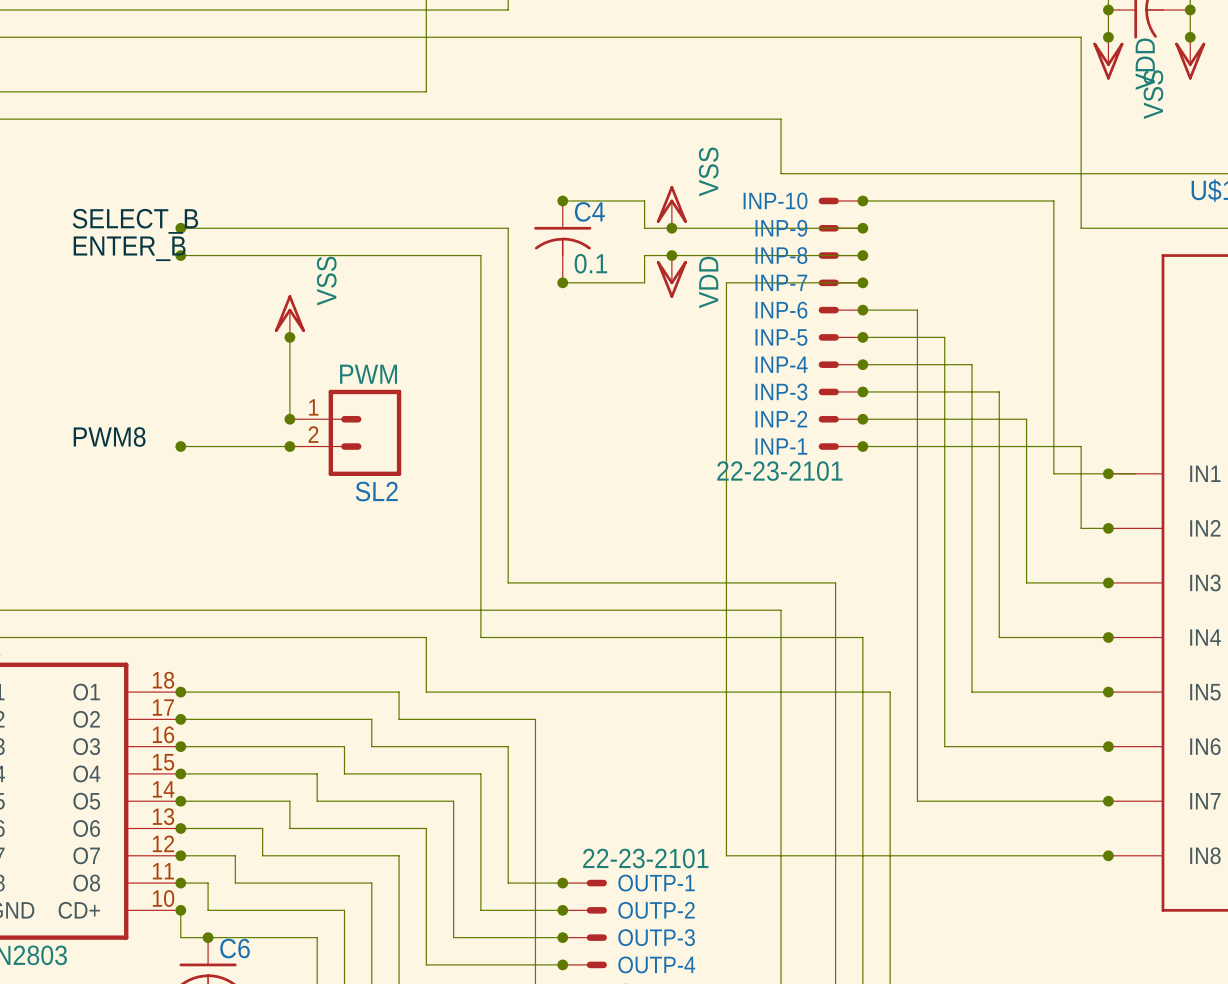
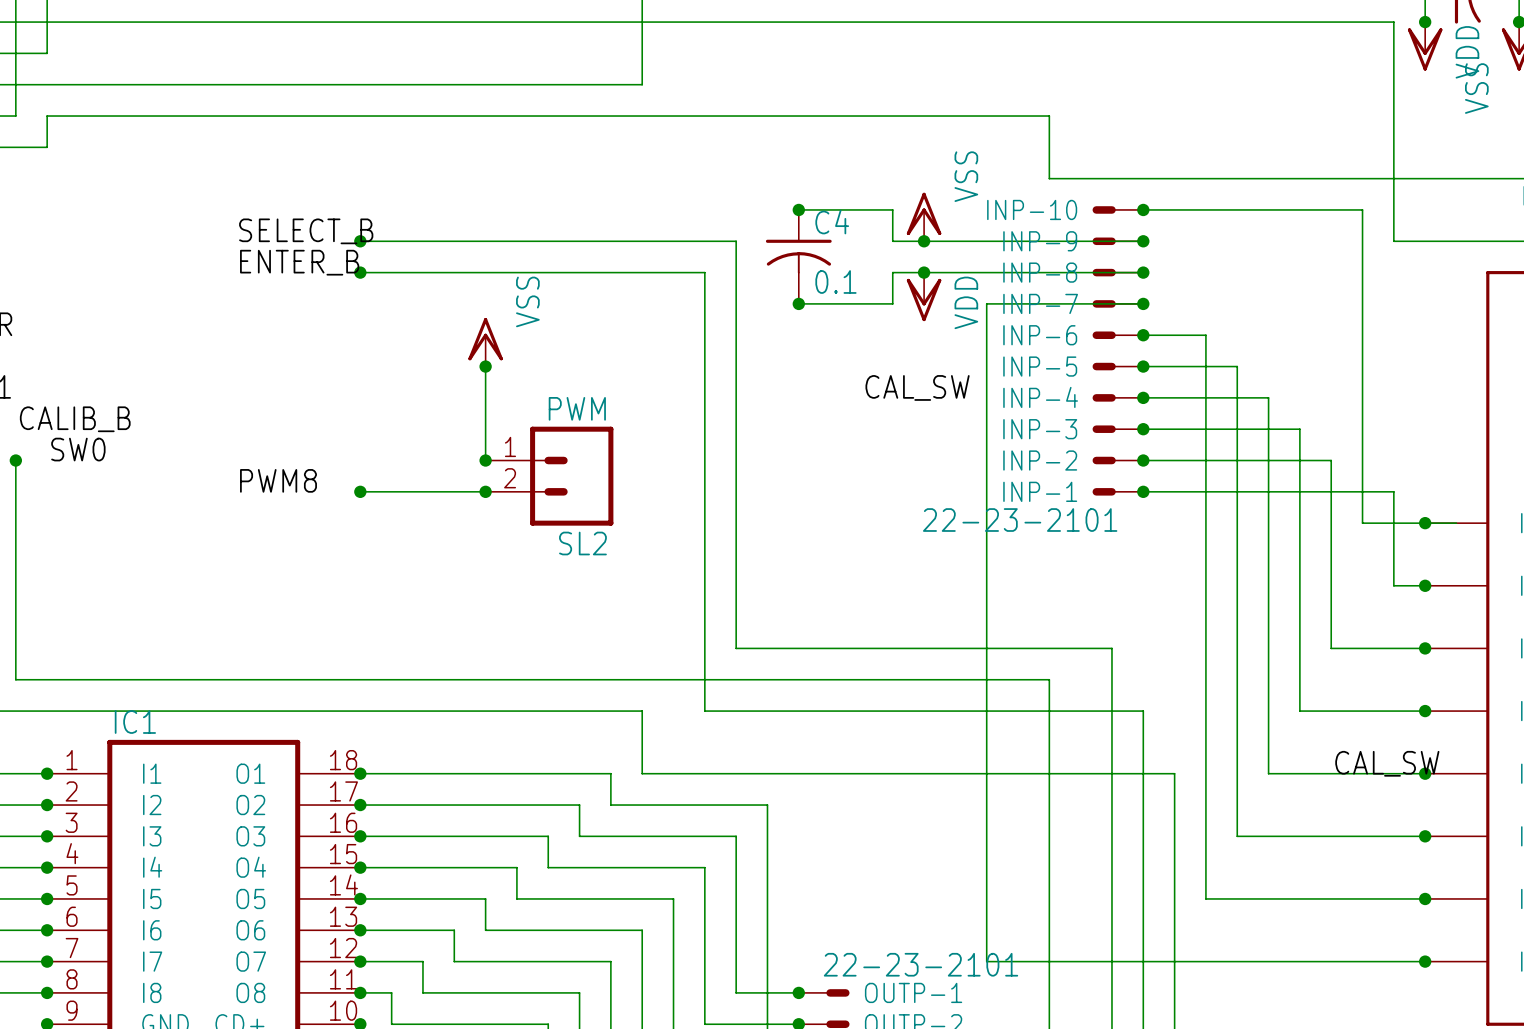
label: none -> CAL_SW (917, 387)
label: none -> CAL_SW (1387, 763)

